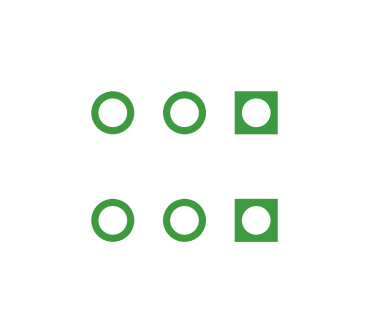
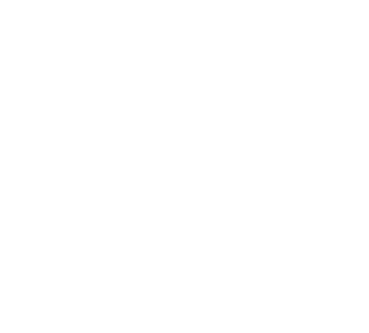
part: (184, 112) -> none
part: (184, 220) -> none

